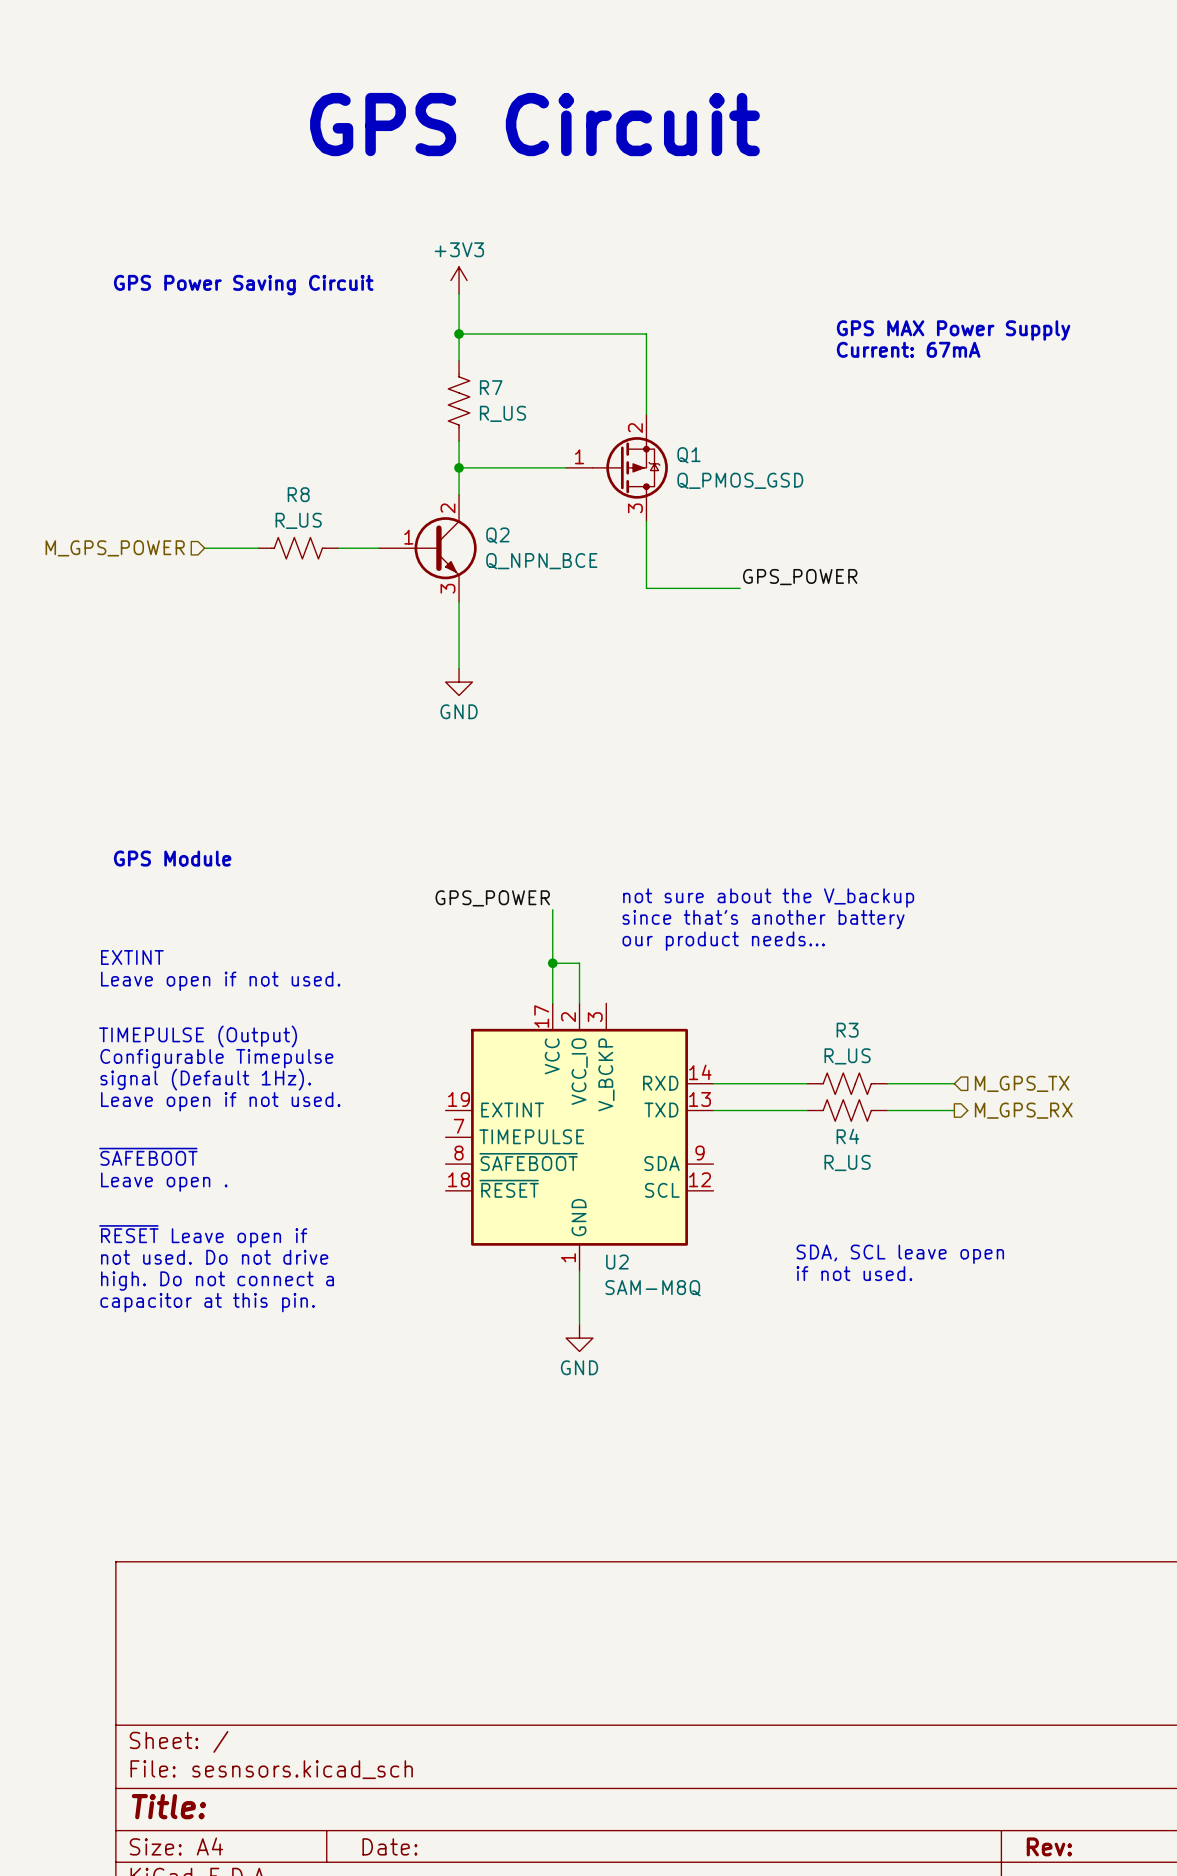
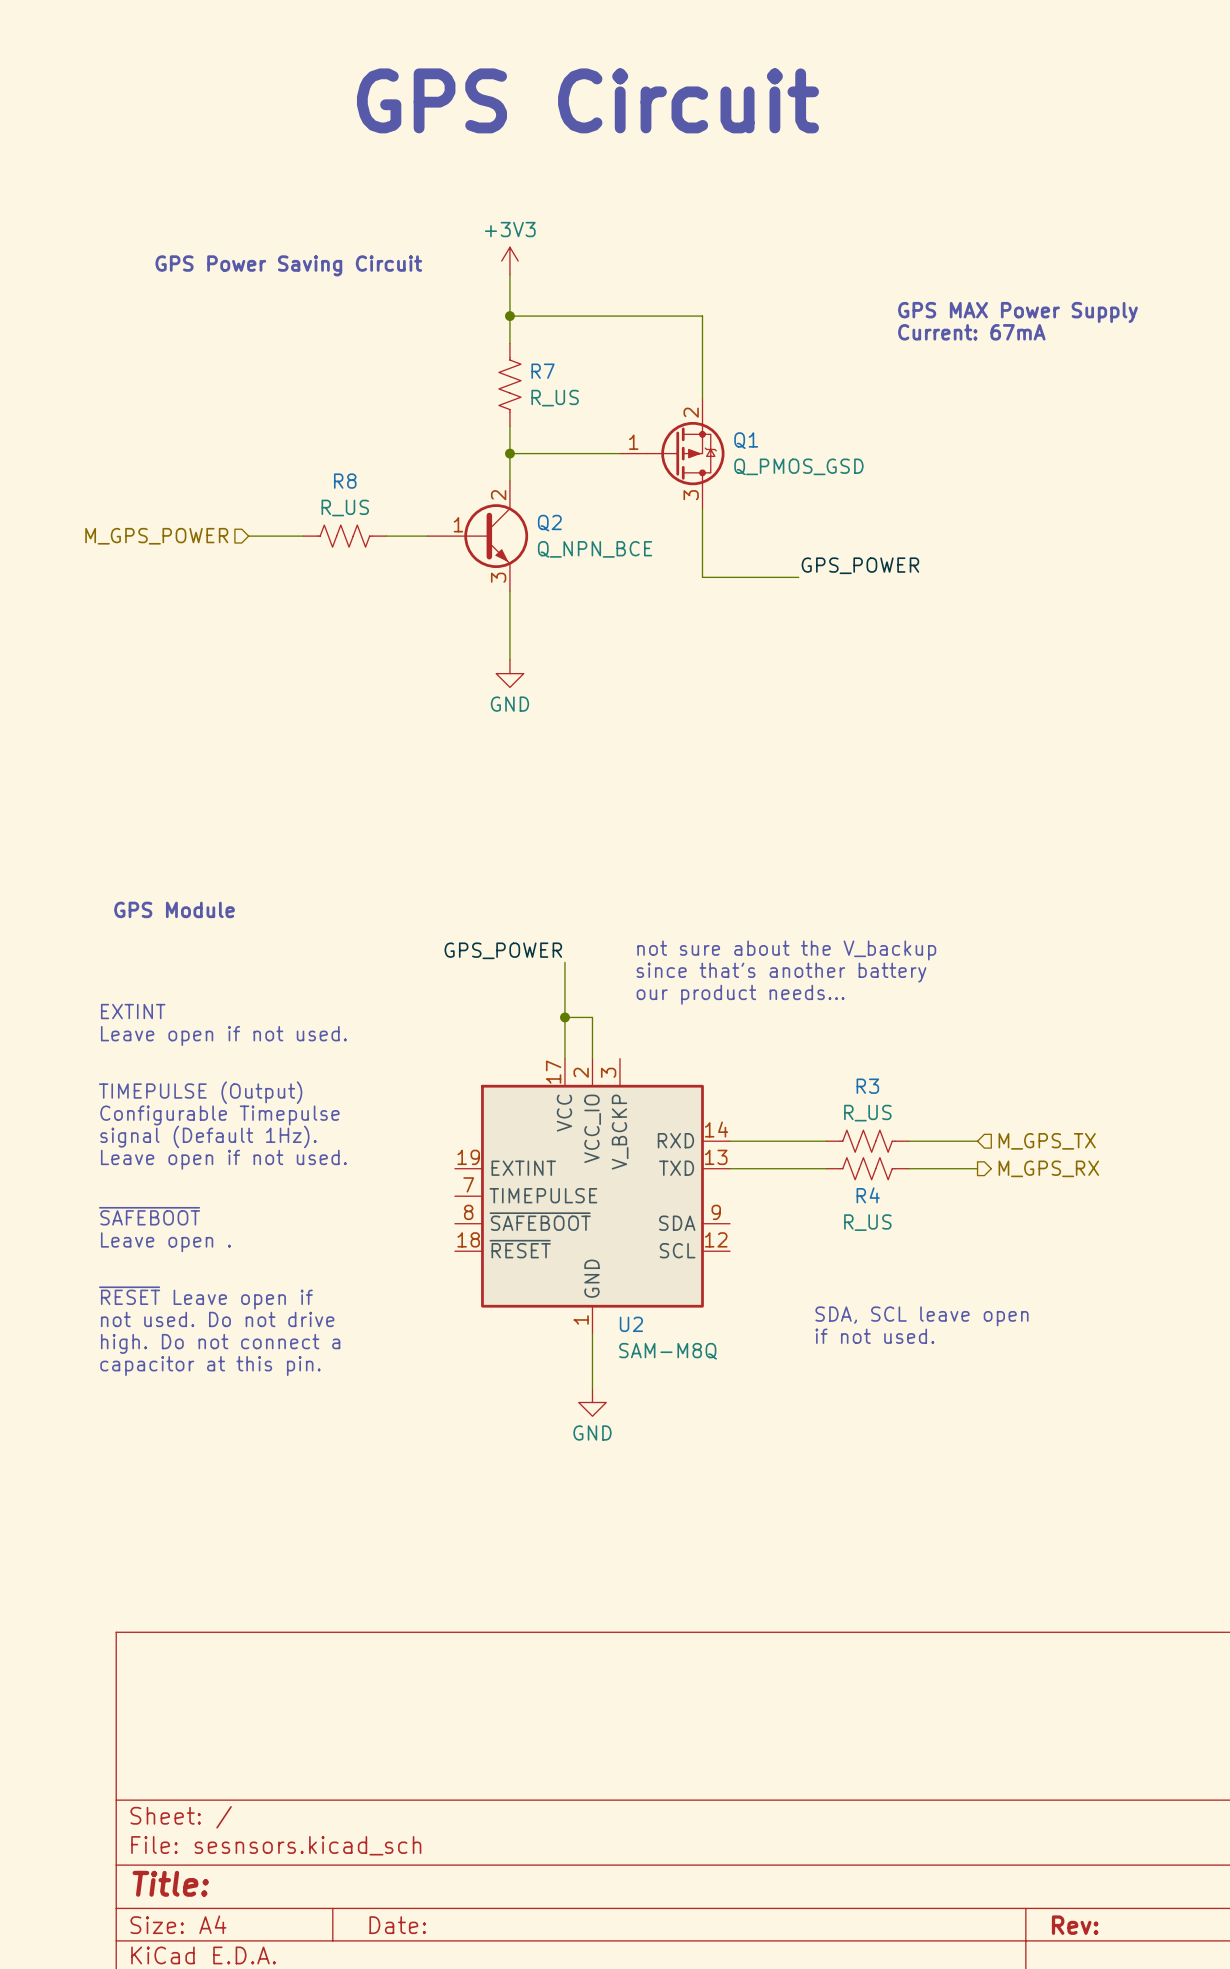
text position: GPS Circuit (534, 124) -> GPS Circuit (587, 100)
power symbol position: +3V3 (459, 280) -> +3V3 (509, 261)
junction: none -> (509, 316)
text position: GPS Power Saving Circuit (243, 285) -> GPS Power Saving Circuit (288, 265)
wire: (459, 293) (459, 360) -> (509, 274) (509, 343)
text position: GPS MAX Power Supply (953, 330) -> GPS MAX Power Supply (1017, 312)
wire: (459, 334) (646, 334) (646, 414) -> (509, 316) (702, 316) (702, 398)
junction: (459, 334) -> none
text position: Current: 67mA (908, 349) -> Current: 67mA (971, 332)
R7 position: (459, 400) -> (509, 384)
junction: none -> (509, 453)
wire: (459, 441) (459, 494) -> (509, 426) (509, 481)
wire: (459, 467) (566, 467) -> (509, 453) (619, 453)
junction: (459, 467) -> none
Q1 position: (617, 467) -> (672, 453)
wire: (646, 521) (646, 588) (740, 588) -> (702, 508) (702, 577) (798, 577)
hierarchical label position: M_GPS_POWER (115, 548) -> M_GPS_POWER (156, 536)
wire: (204, 548) (258, 548) -> (248, 536) (303, 536)
R8 position: (298, 548) -> (344, 536)
wire: (338, 548) (378, 548) -> (386, 536) (427, 536)
Q2 position: (427, 548) -> (477, 536)
label position: GPS_POWER (800, 577) -> GPS_POWER (860, 565)
wire: (459, 601) (459, 668) -> (509, 591) (509, 659)
power symbol position: GND (459, 682) -> GND (509, 673)

